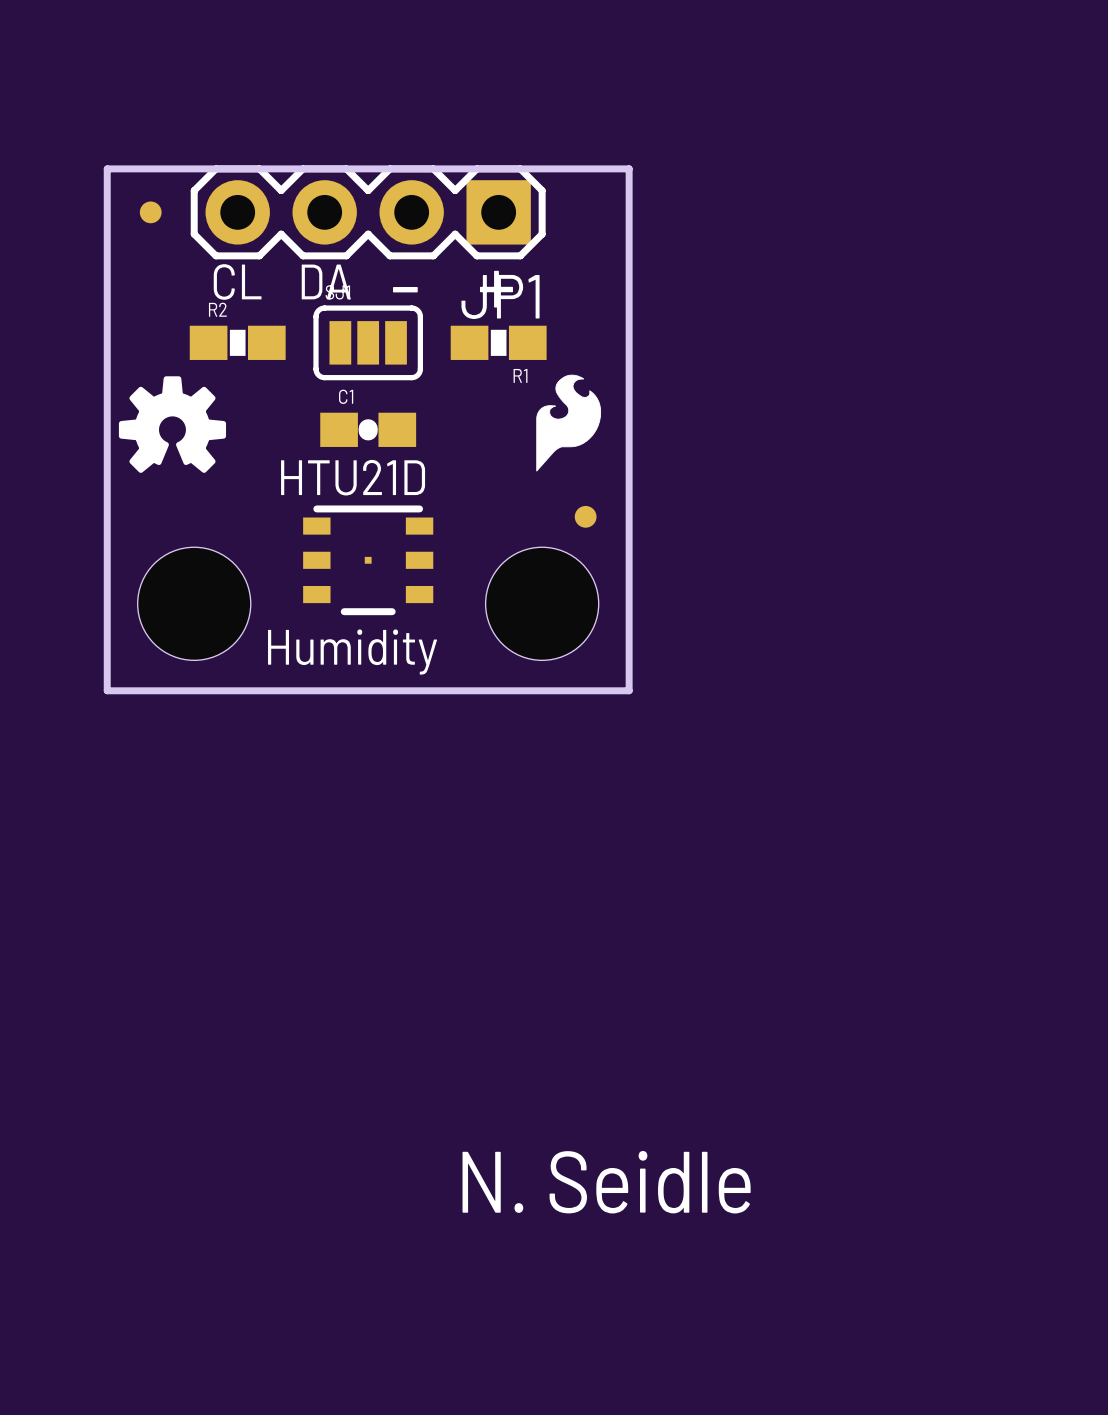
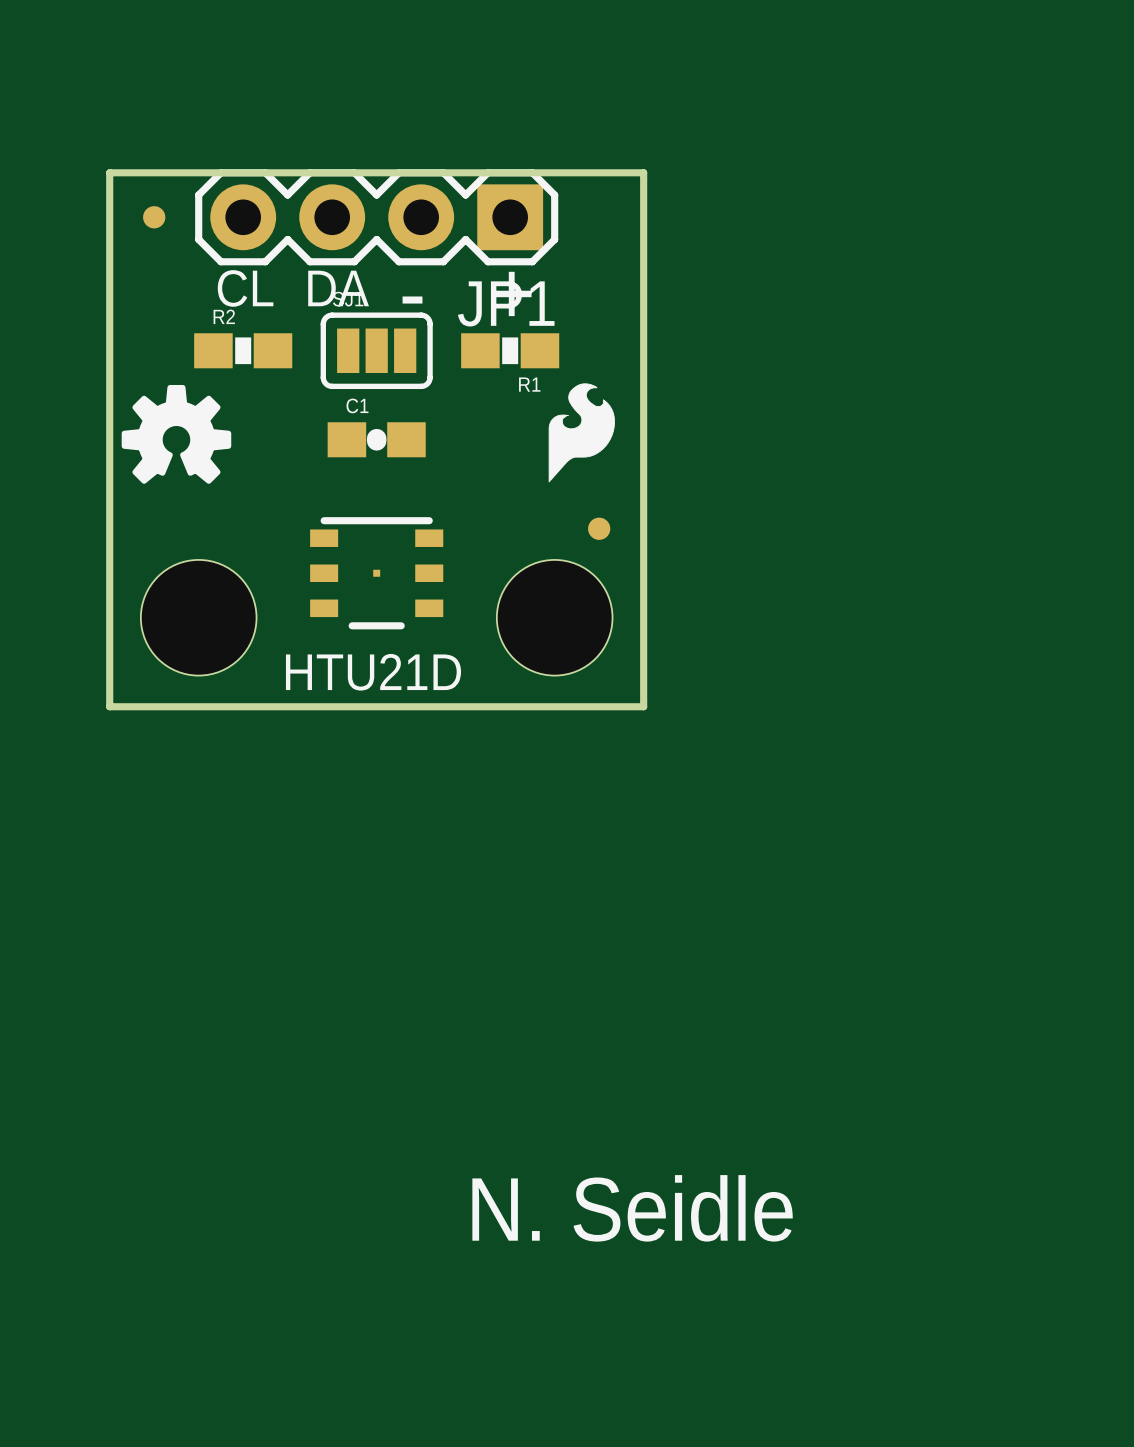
text position: HTU21D (353, 477) -> HTU21D (373, 672)
text: Humidity (352, 652) -> none

